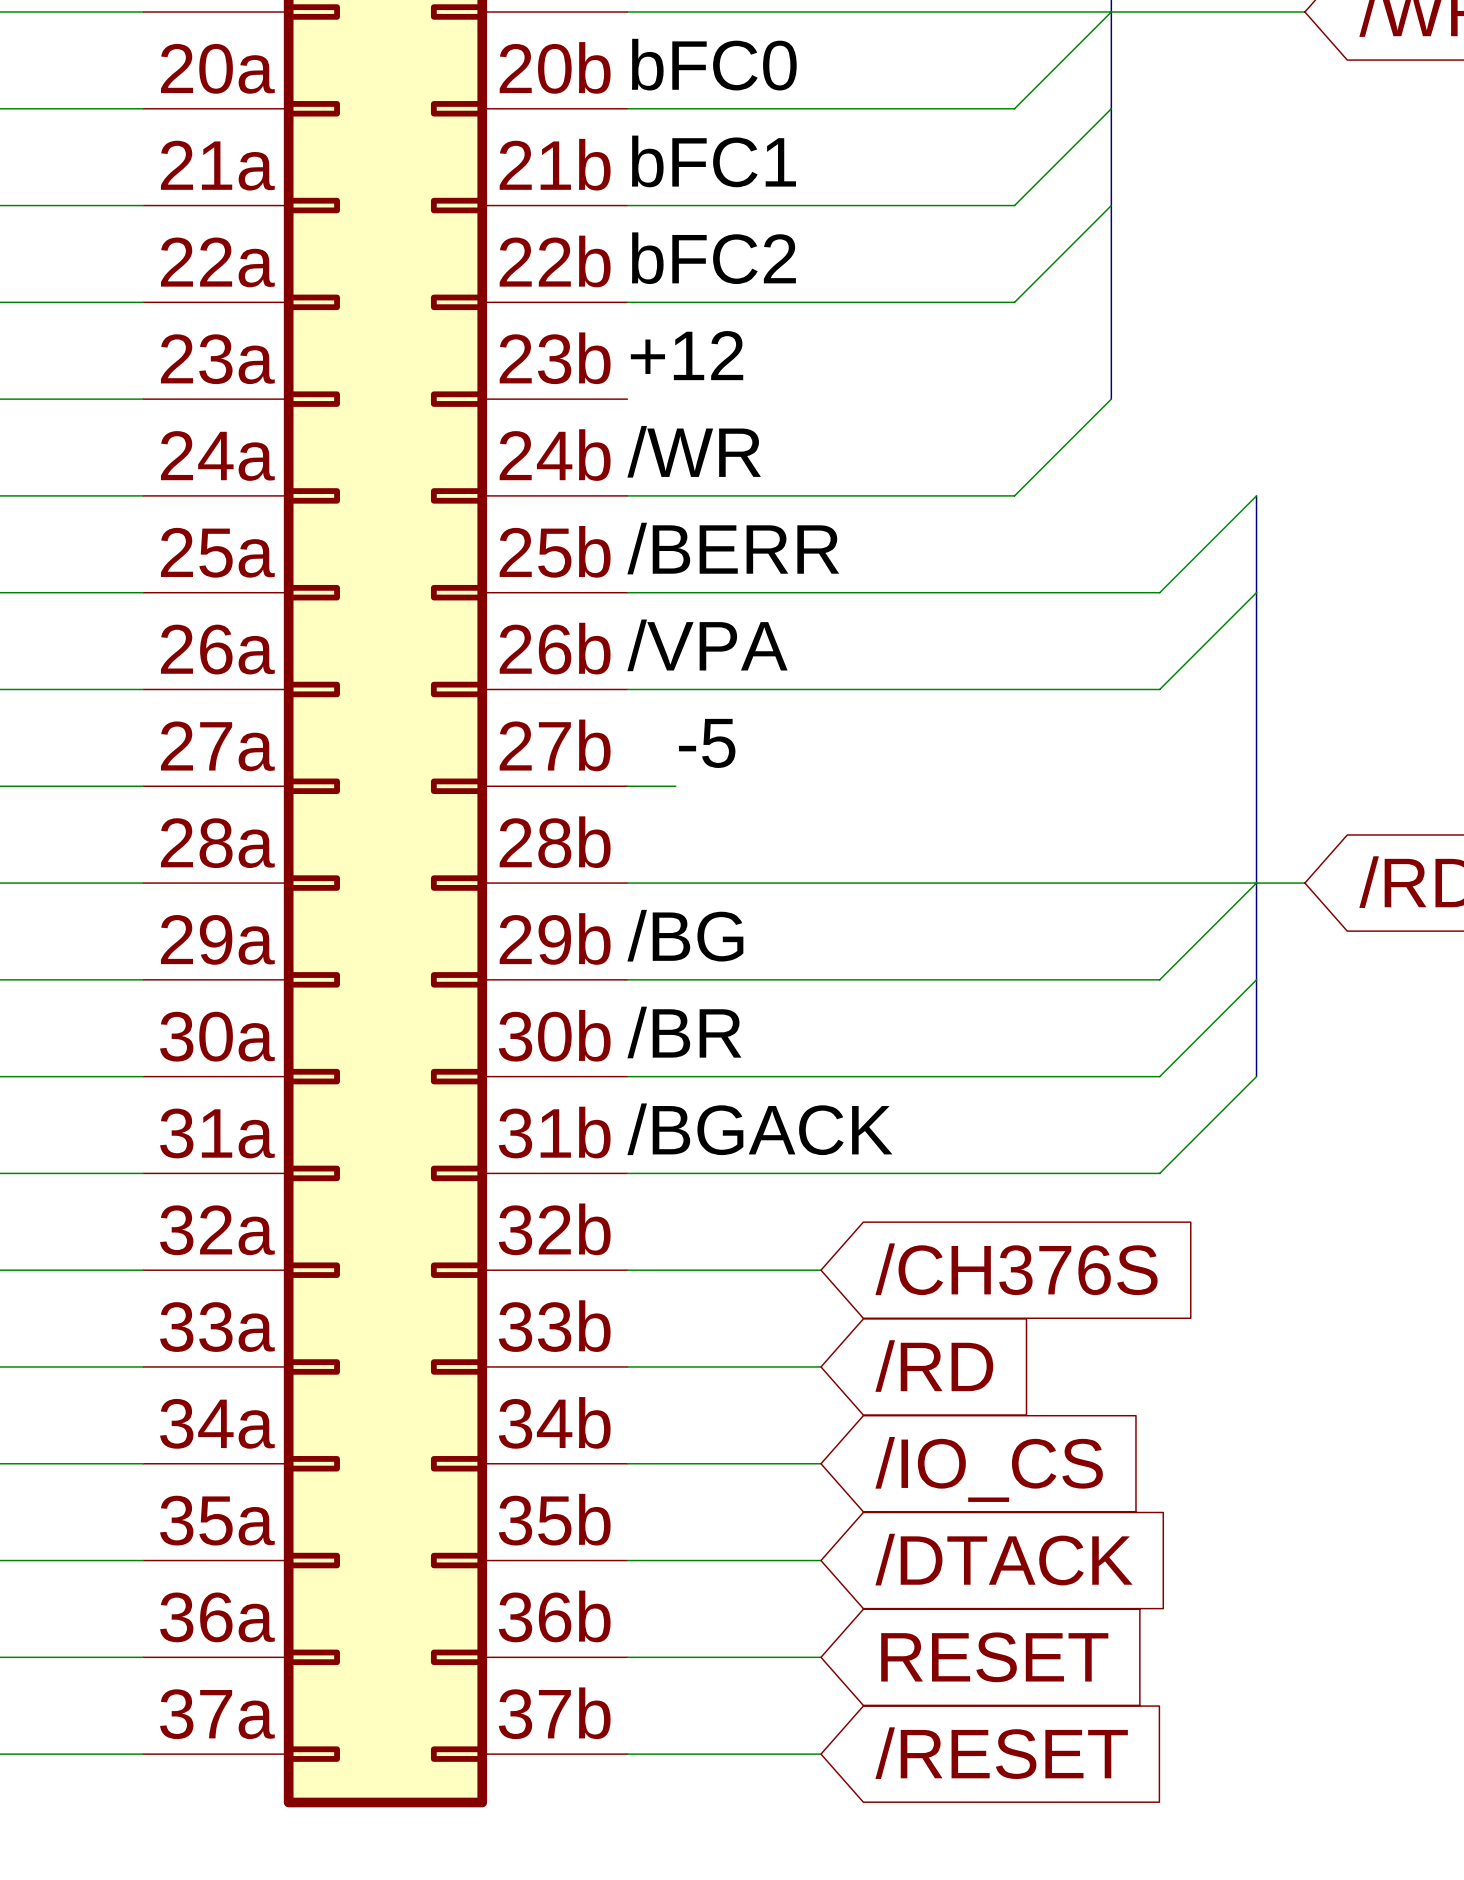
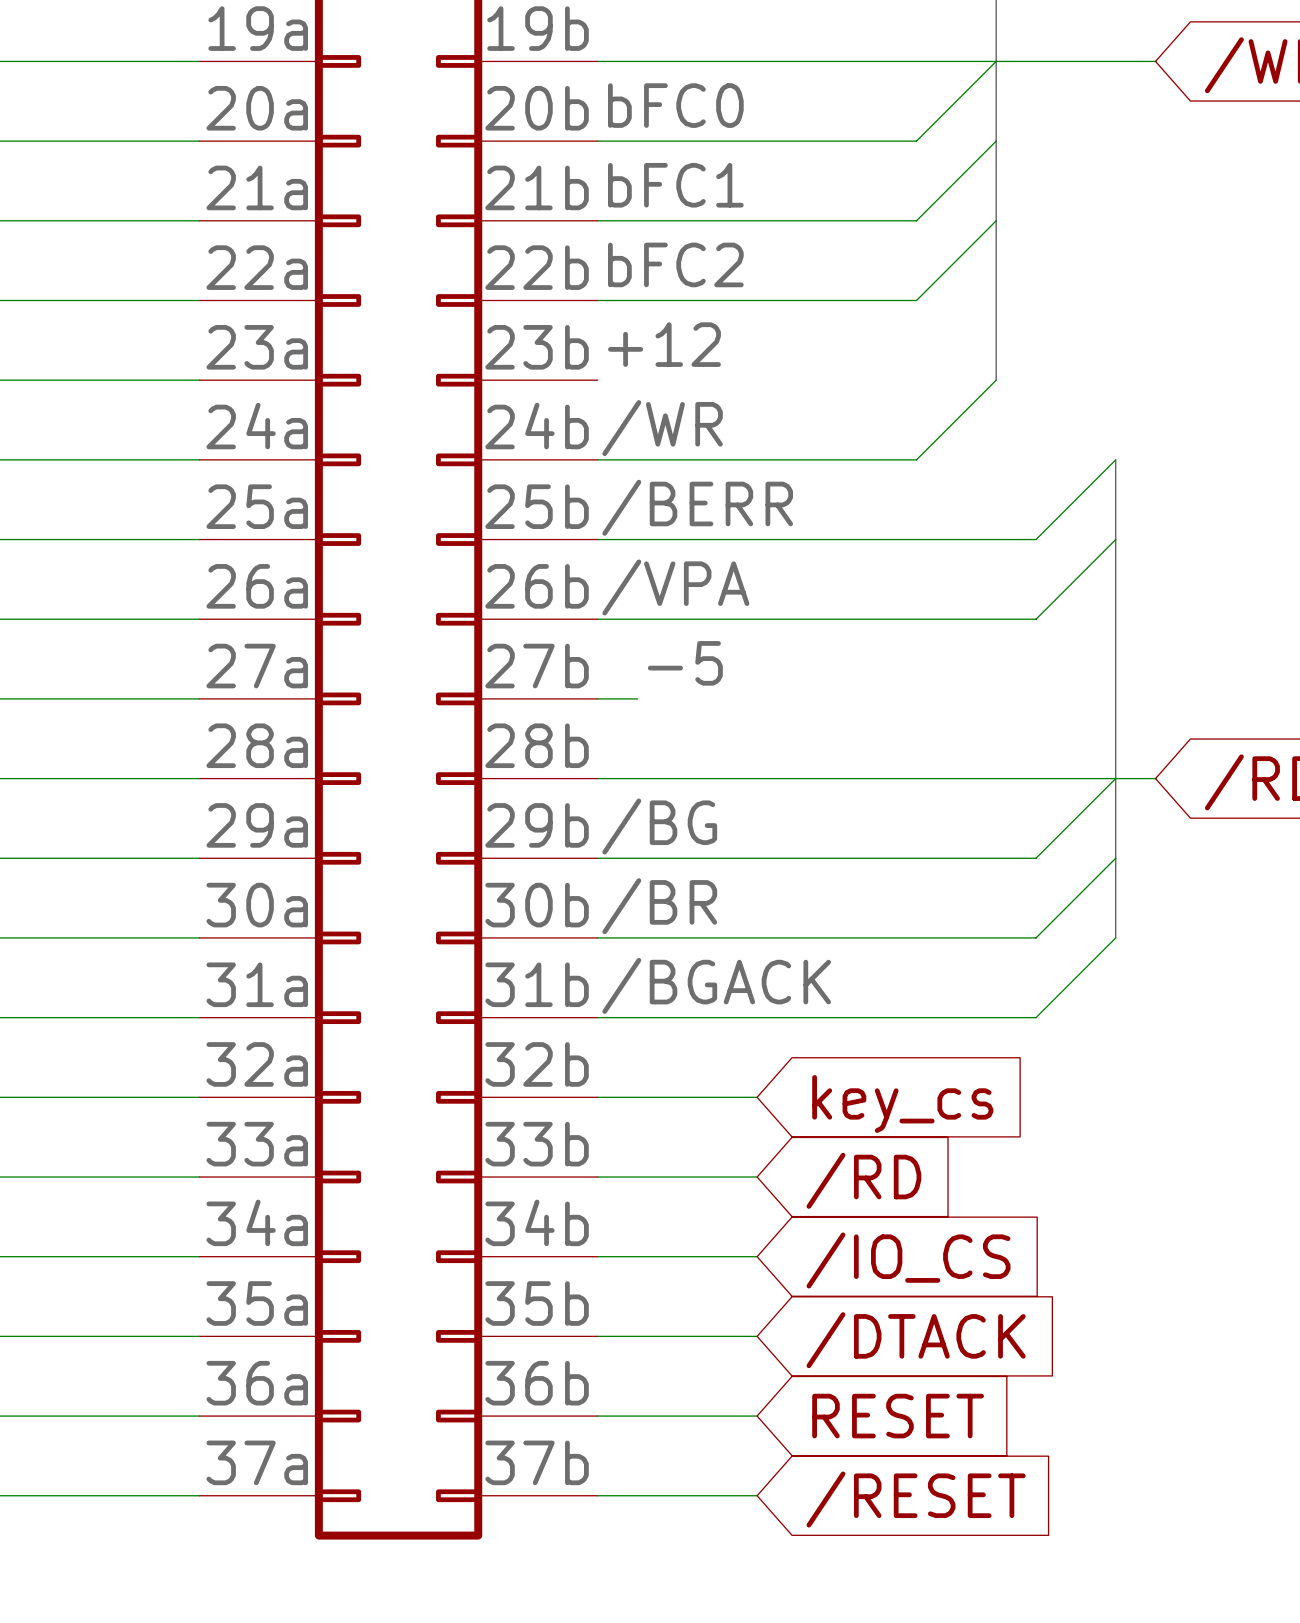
global label: /CH376S (1016, 1269) -> key_cs (902, 1103)

